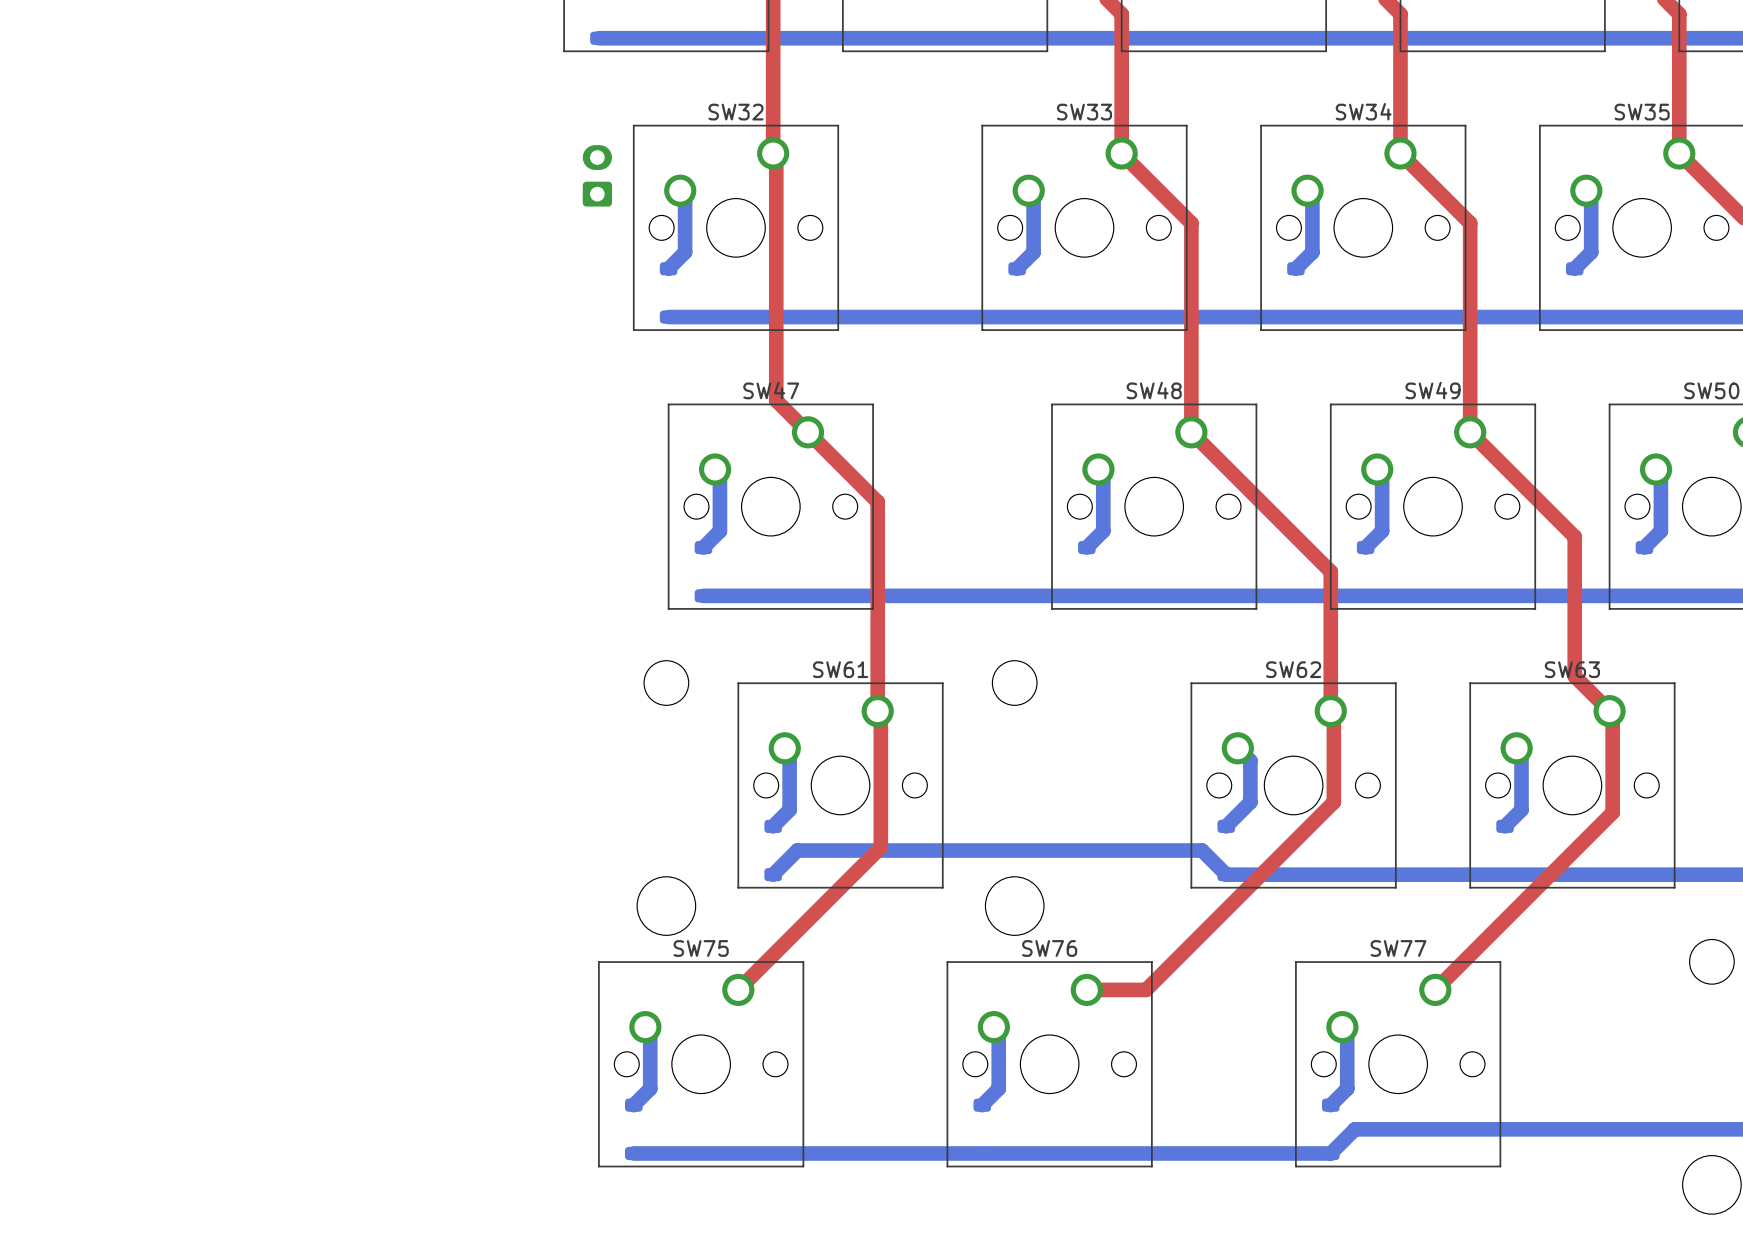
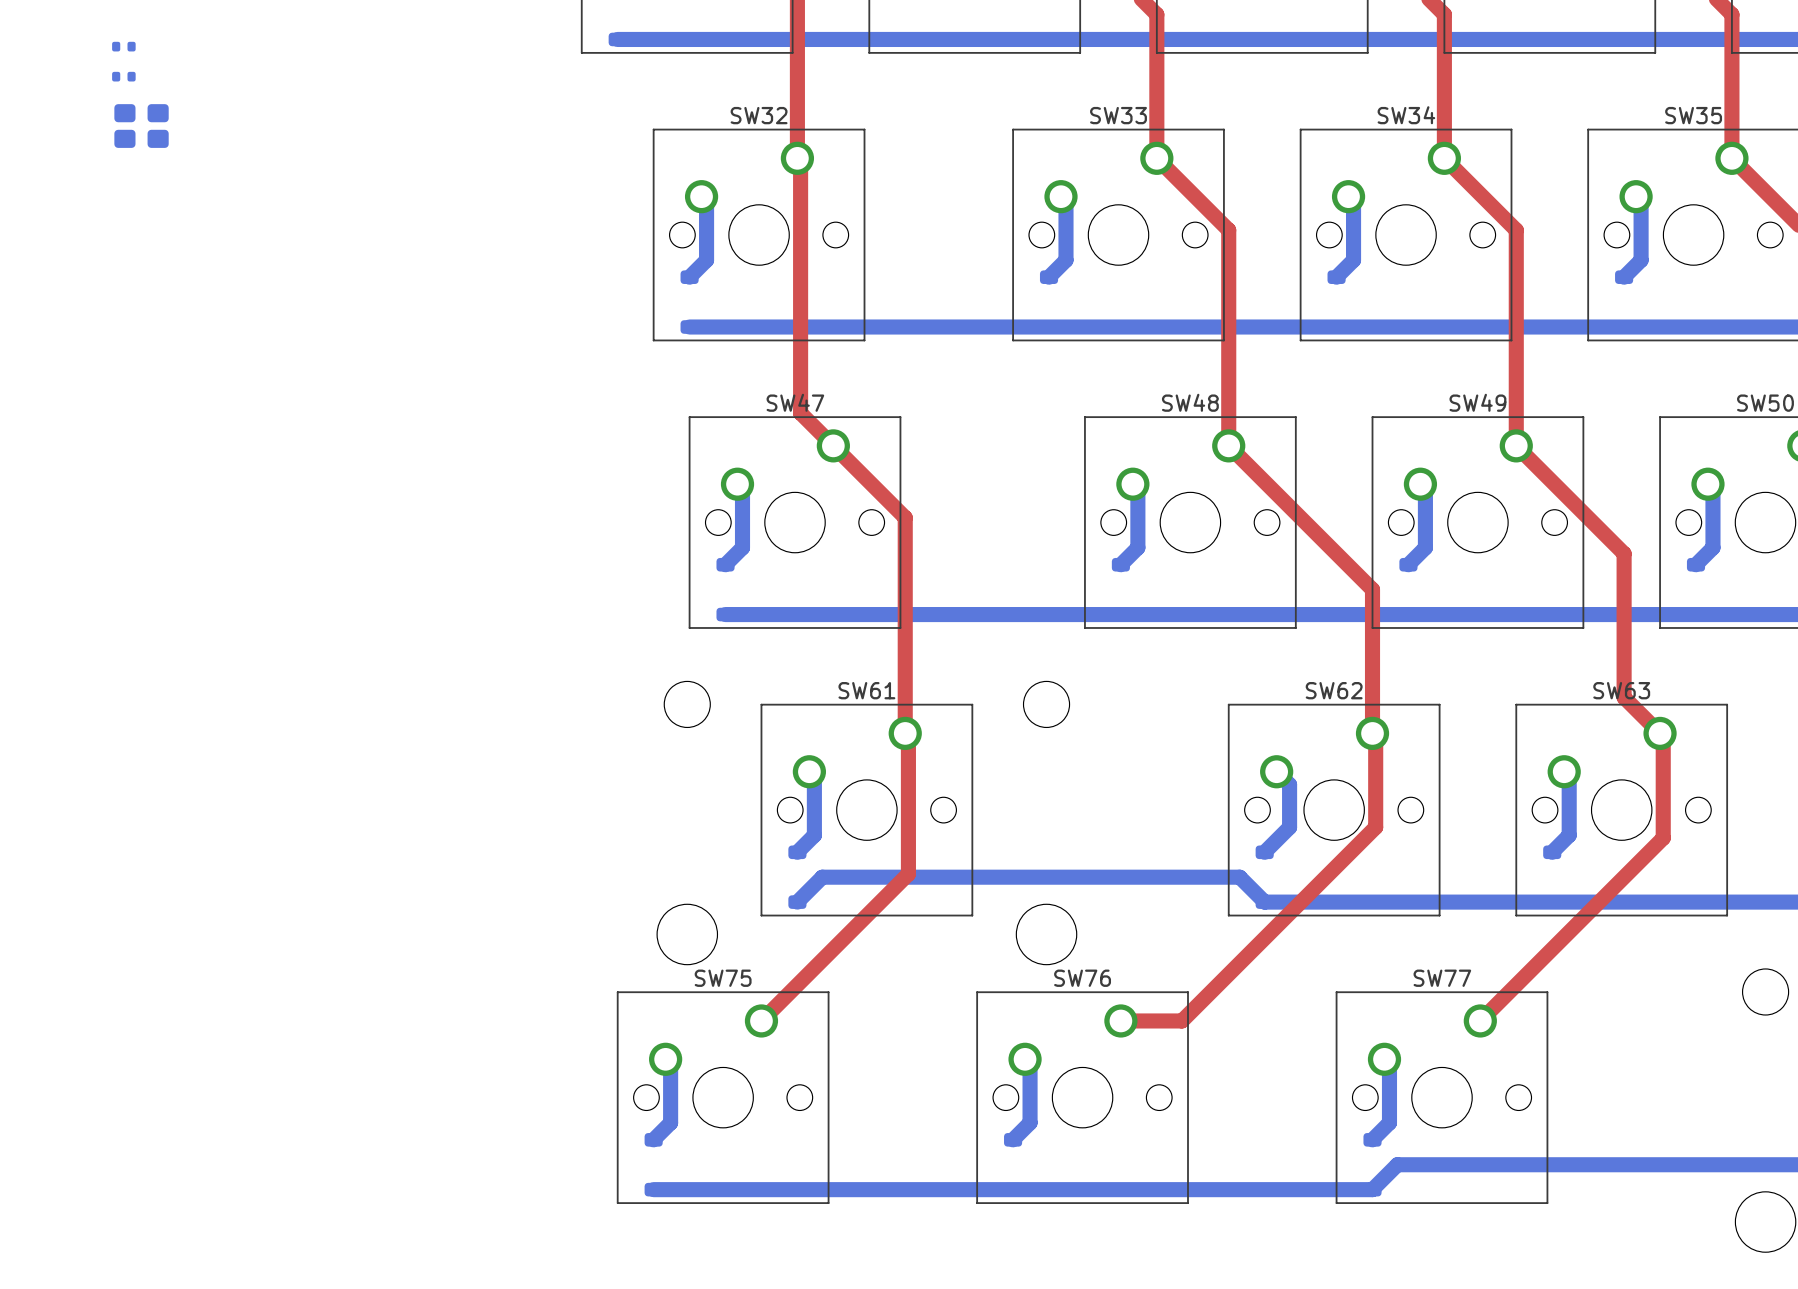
part: none -> (123, 46)
part: none -> (123, 76)
part: none -> (141, 126)
part: (597, 175) -> none

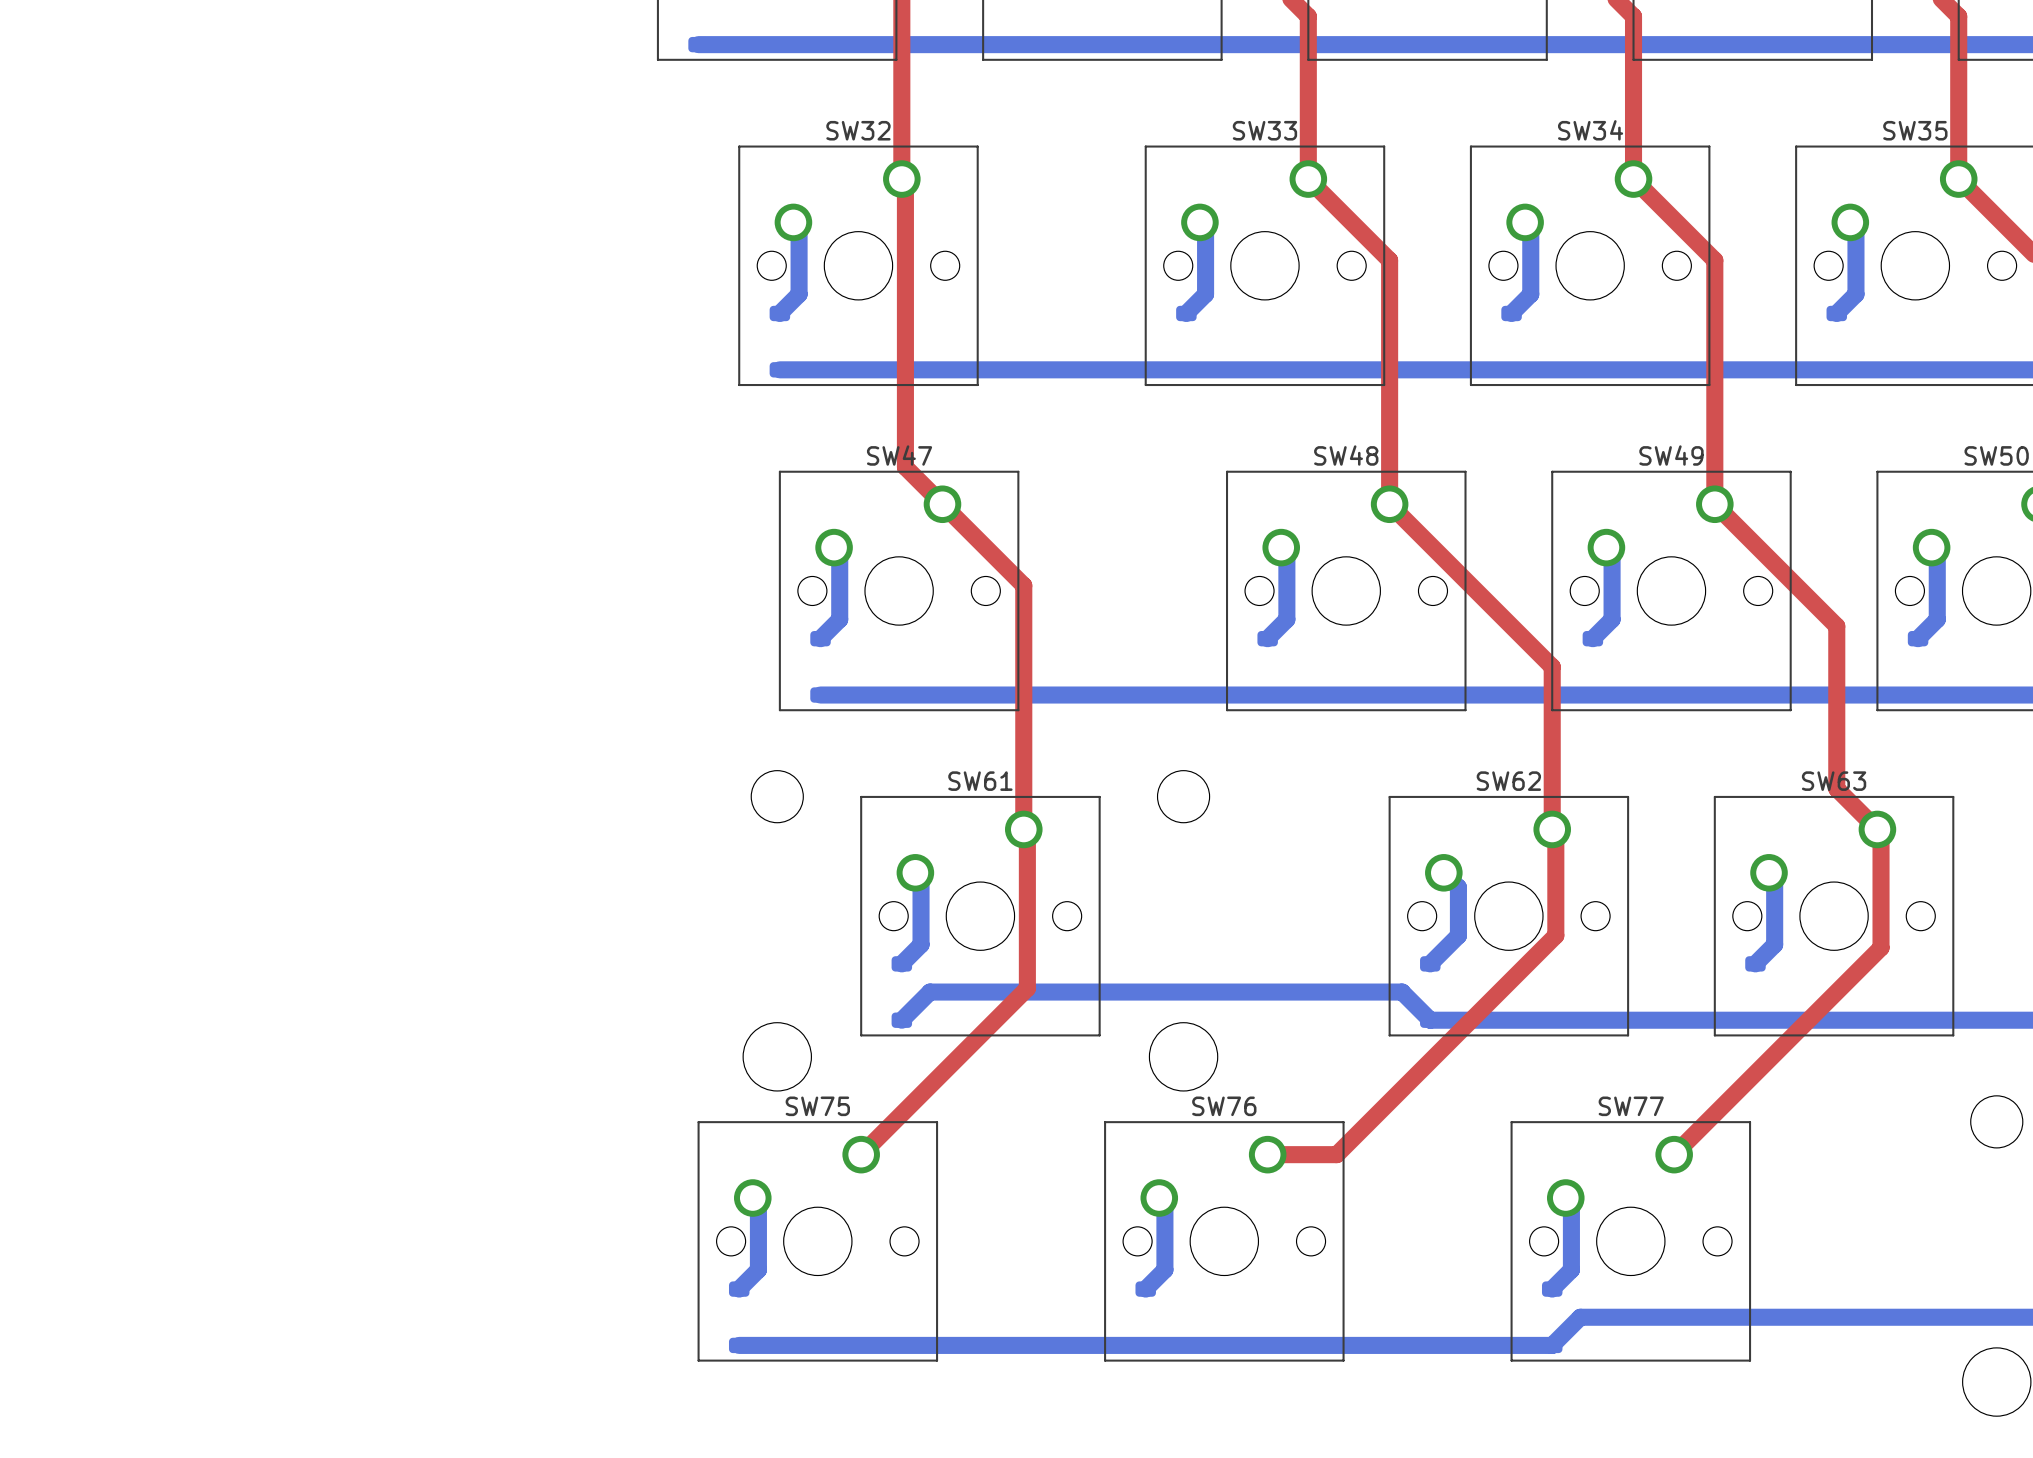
part: (123, 46) -> none
part: (123, 76) -> none
part: (141, 126) -> none

